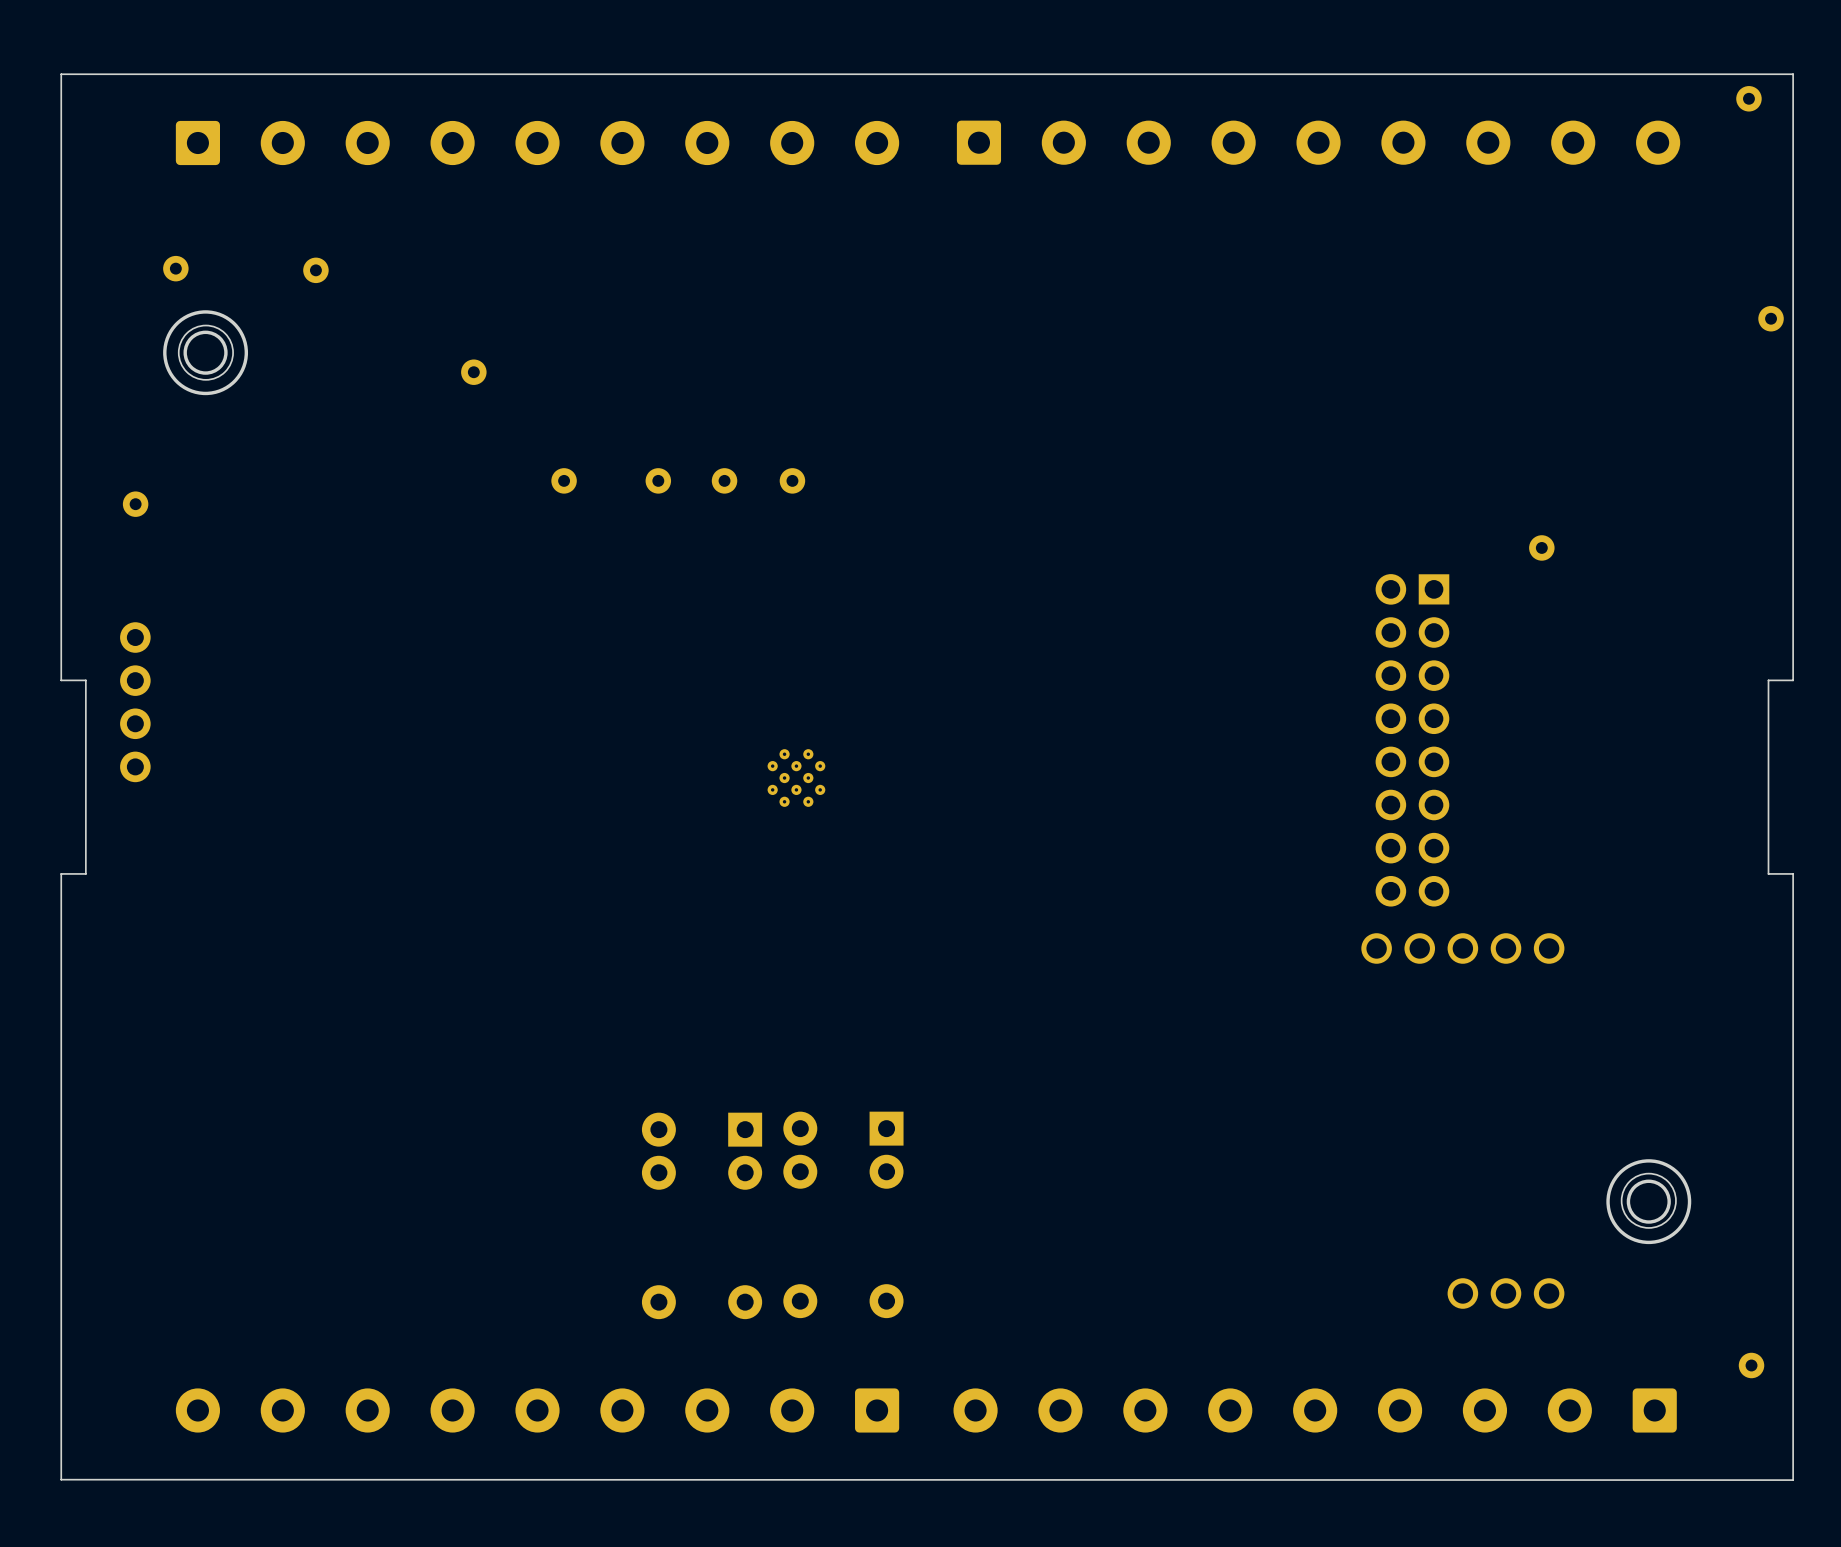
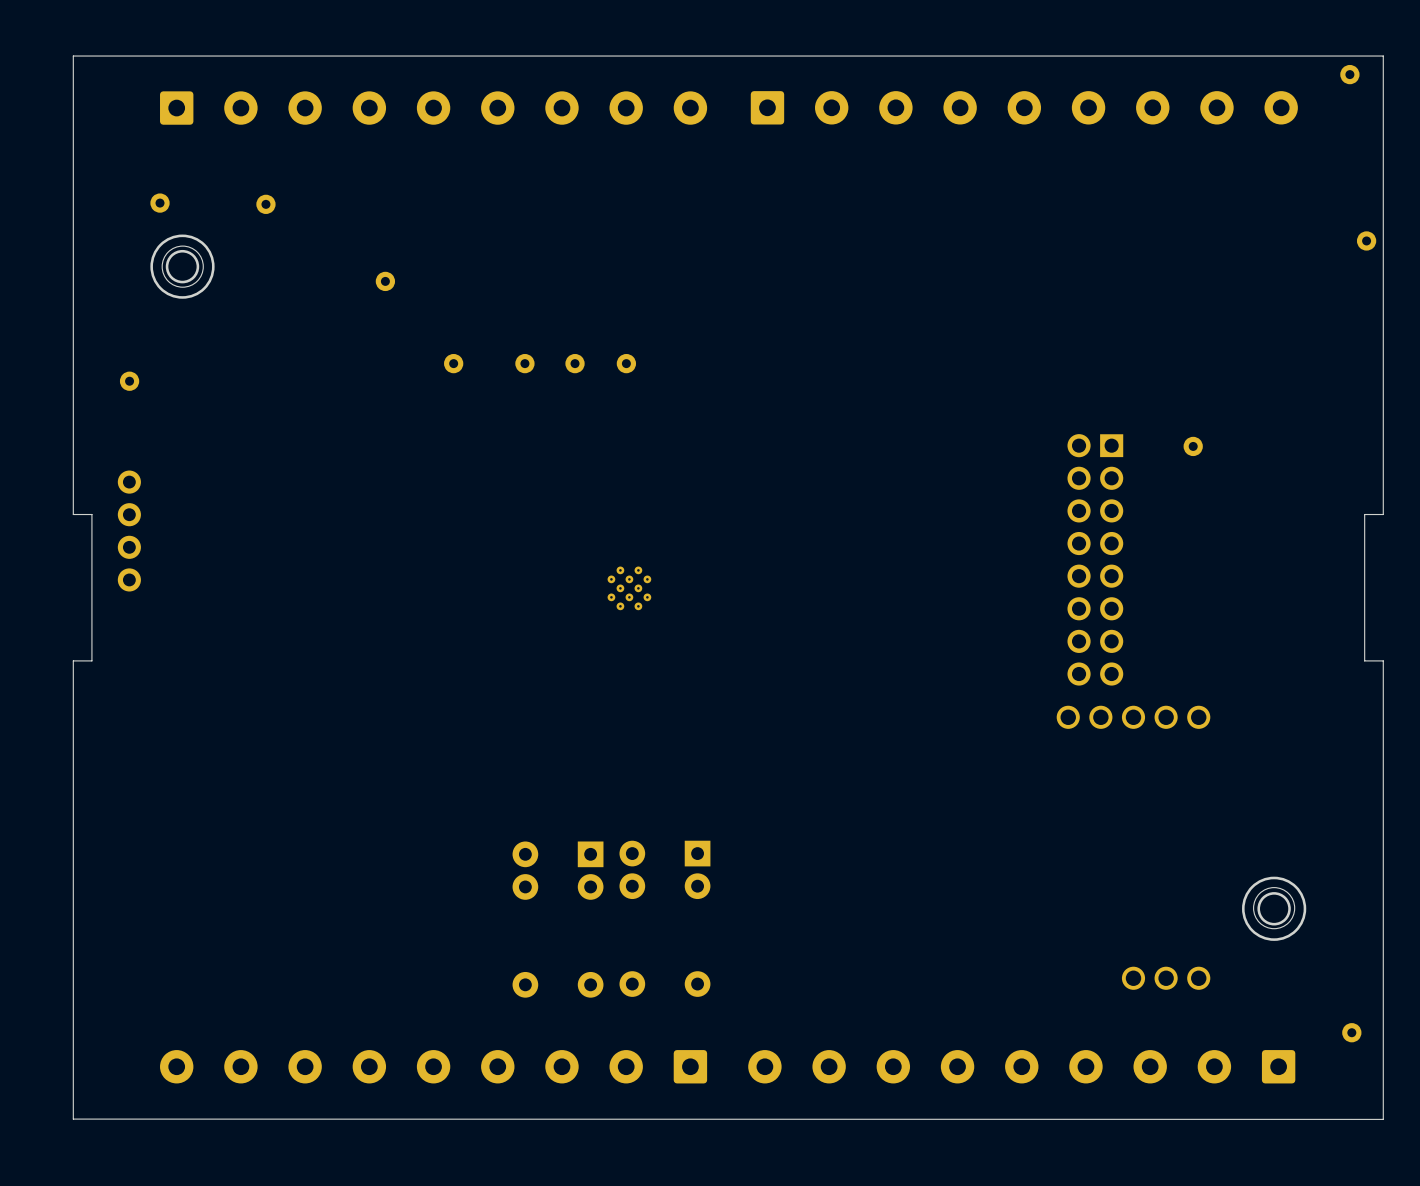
part position: (1541, 547) -> (1193, 446)

